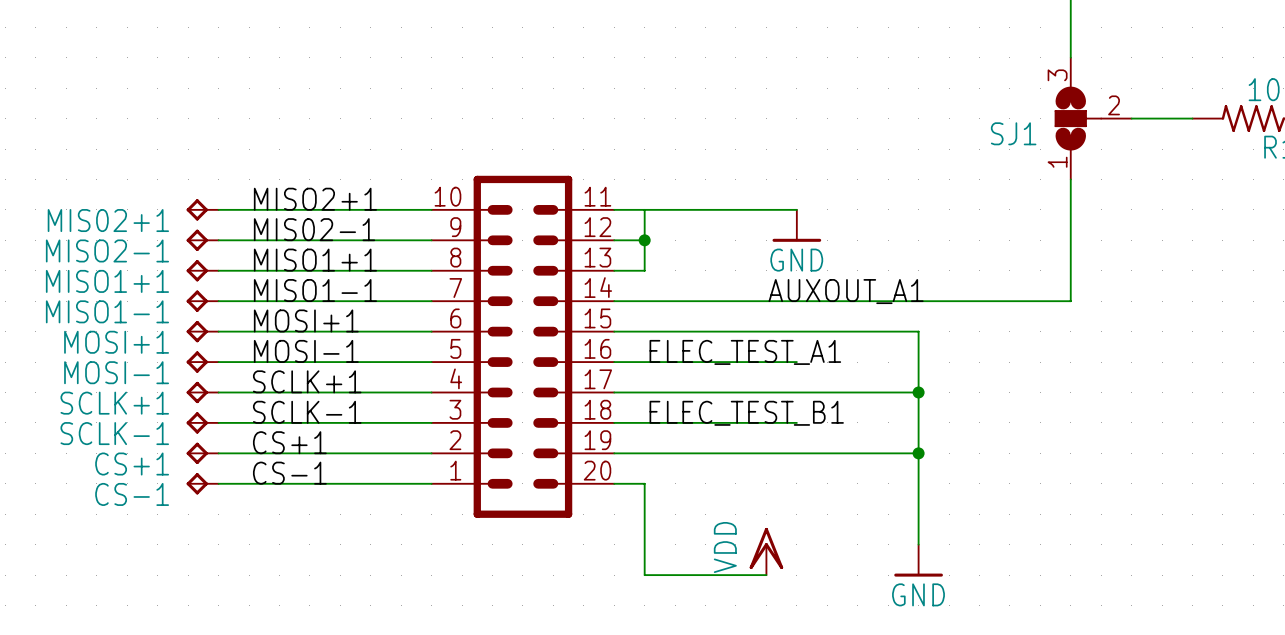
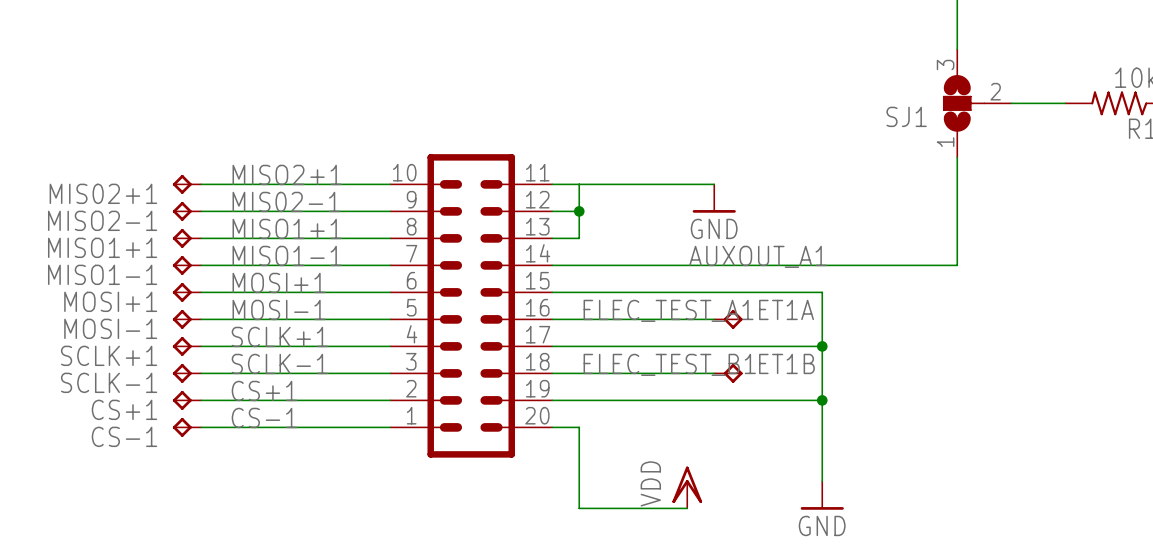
ET1A: none -> (728, 319)
ET1B: none -> (728, 373)

